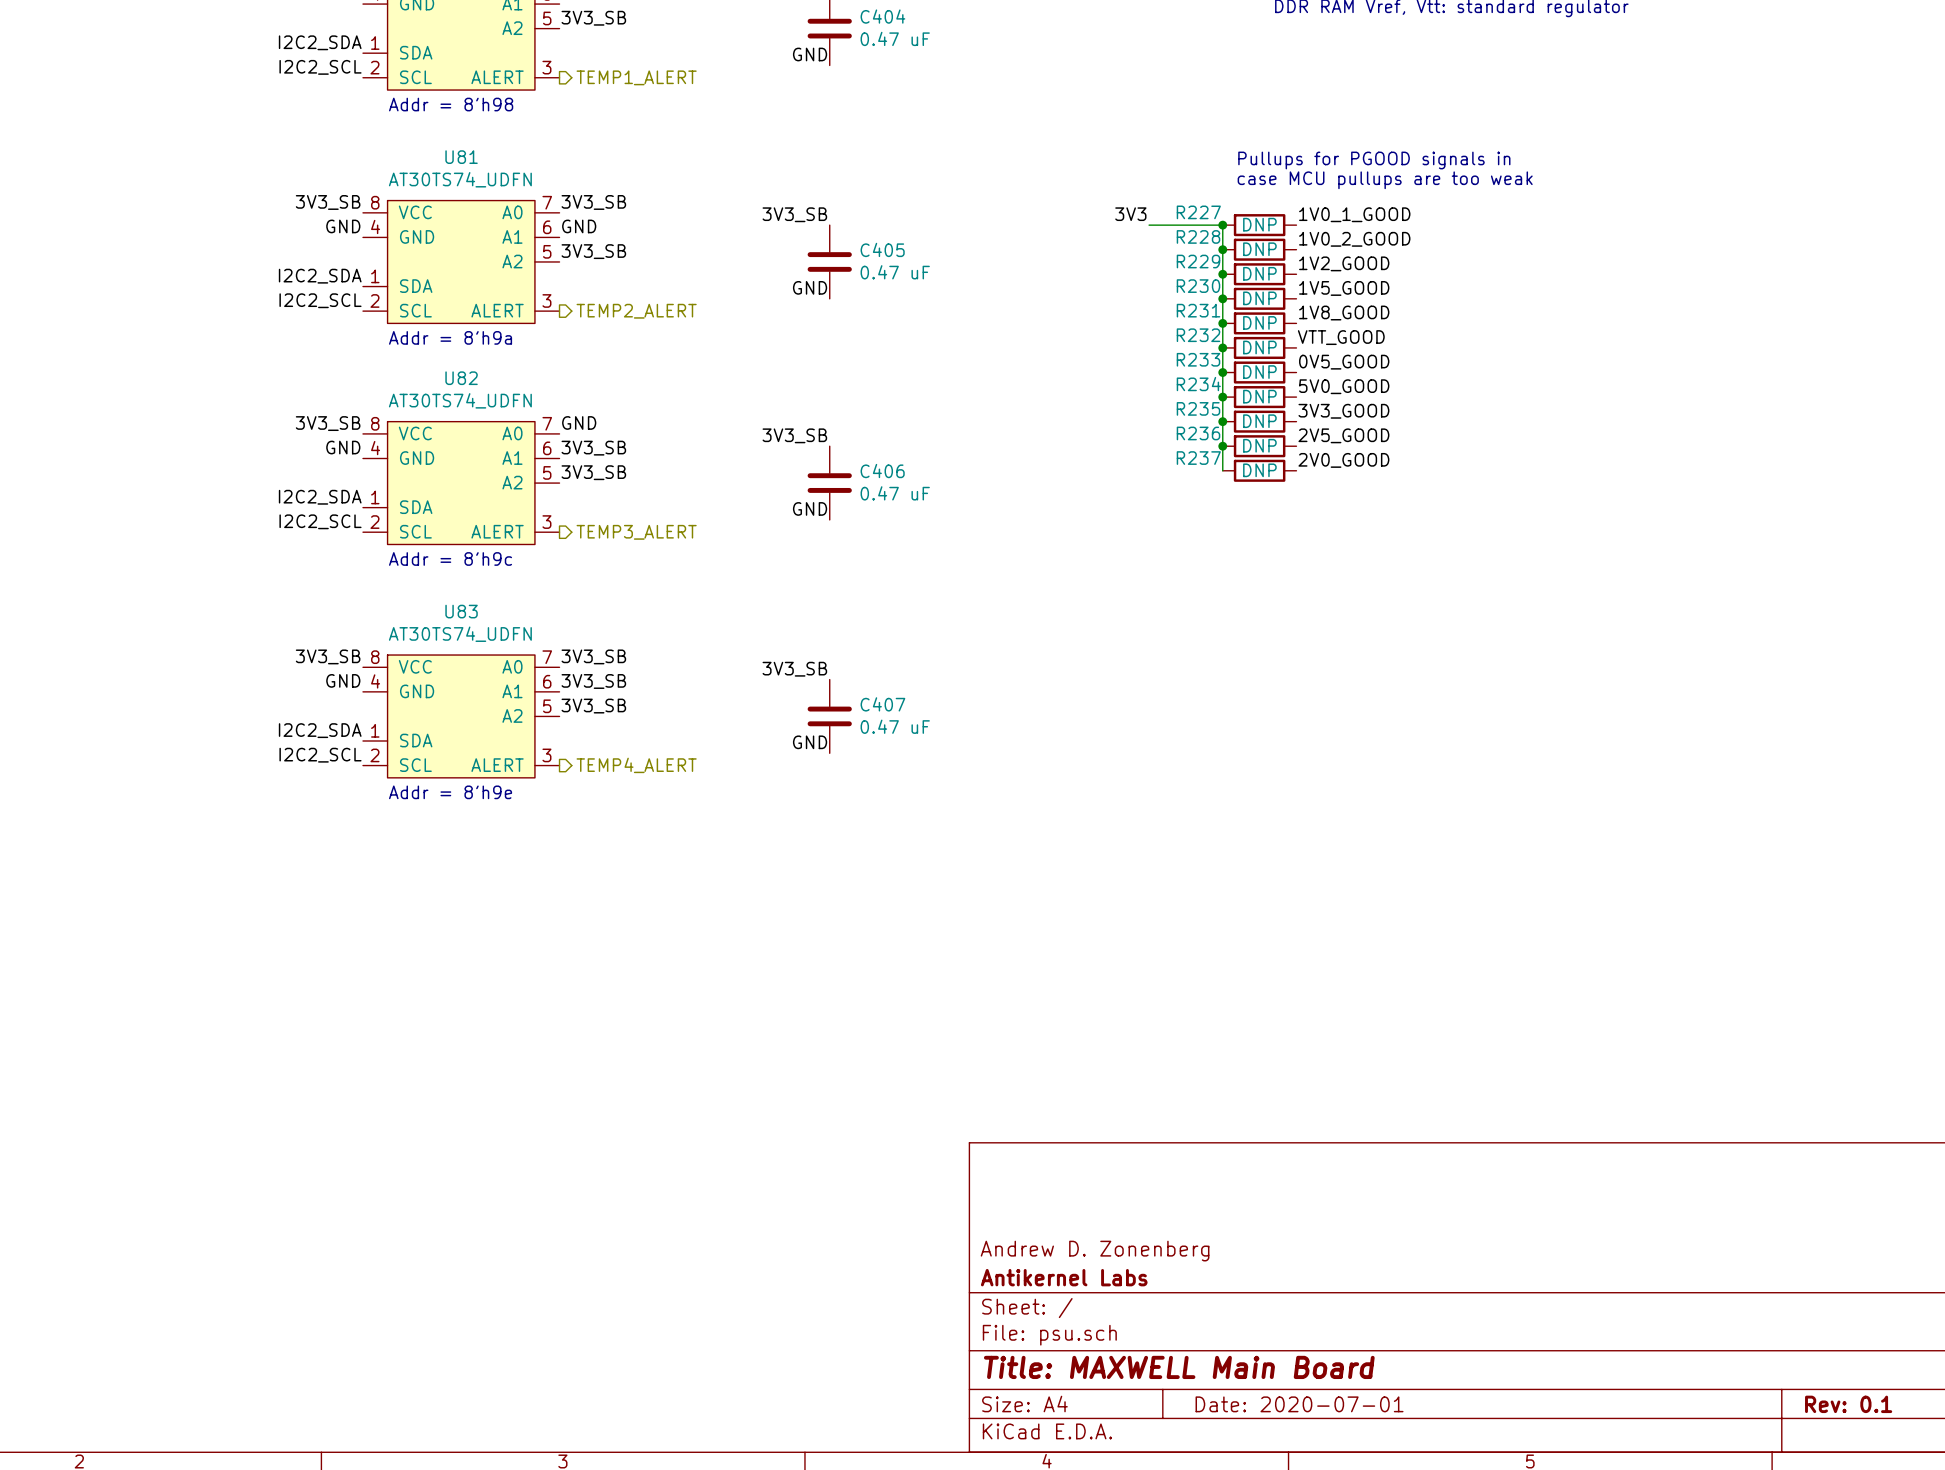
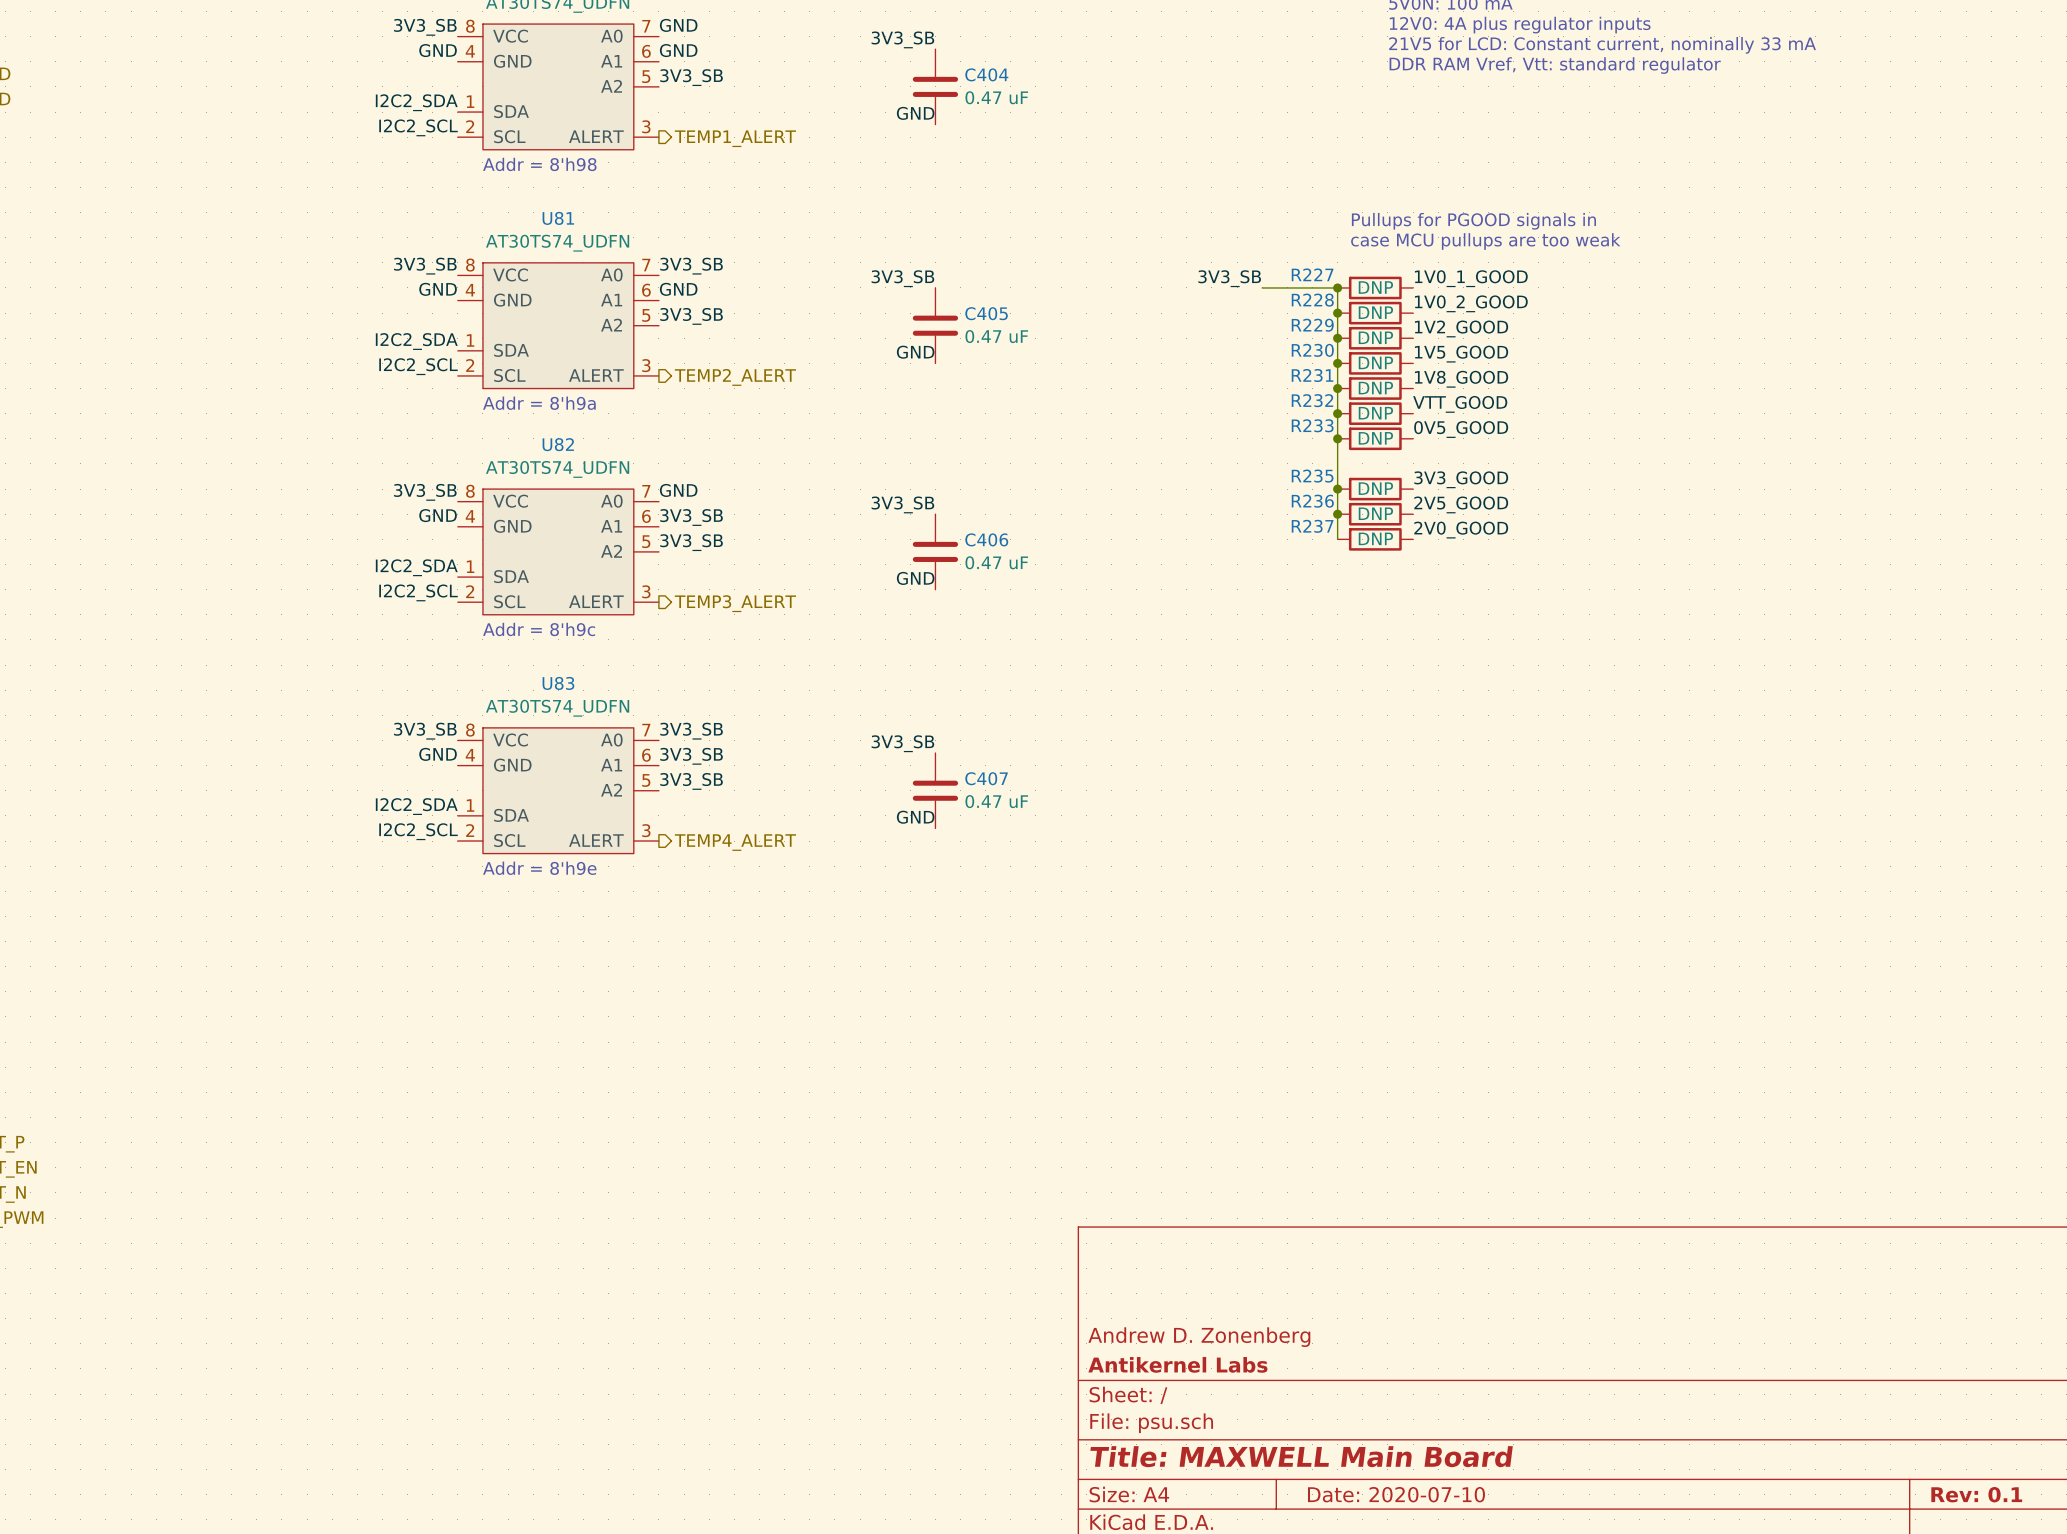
label: 3V3 (1130, 214) -> 3V3_SB (1229, 278)
label: 5V0_GOOD (1344, 386) -> none
junction: (1222, 397) -> none
R234: DNP (1259, 397) -> none
title block: Date: 2020-07-01 (1299, 1404) -> Date: 2020-07-10 (1396, 1494)

